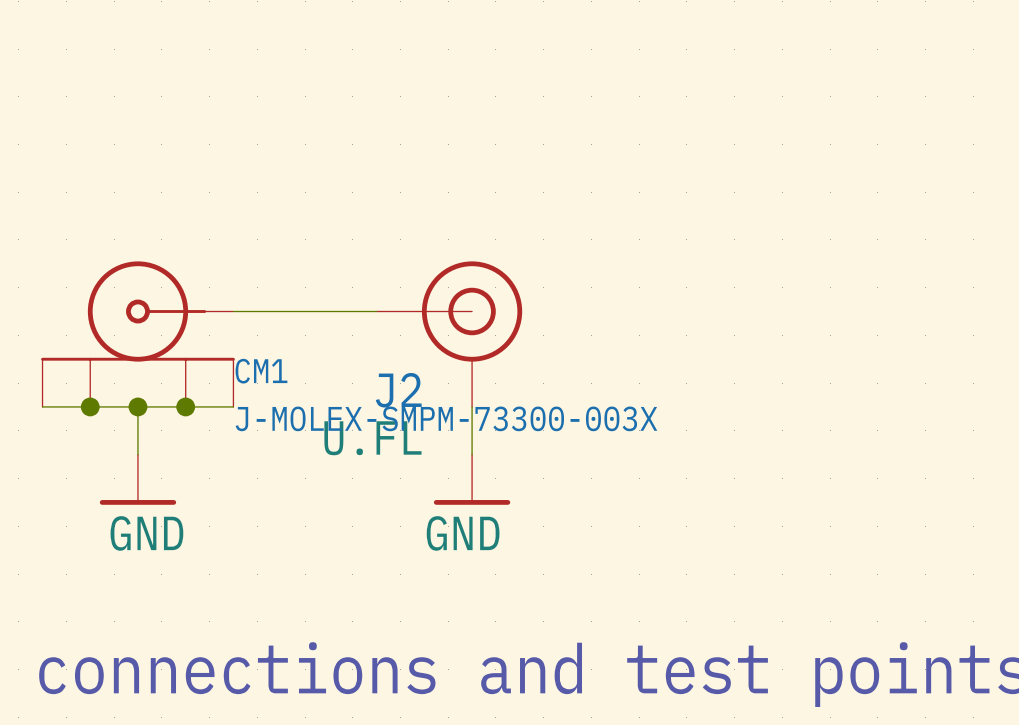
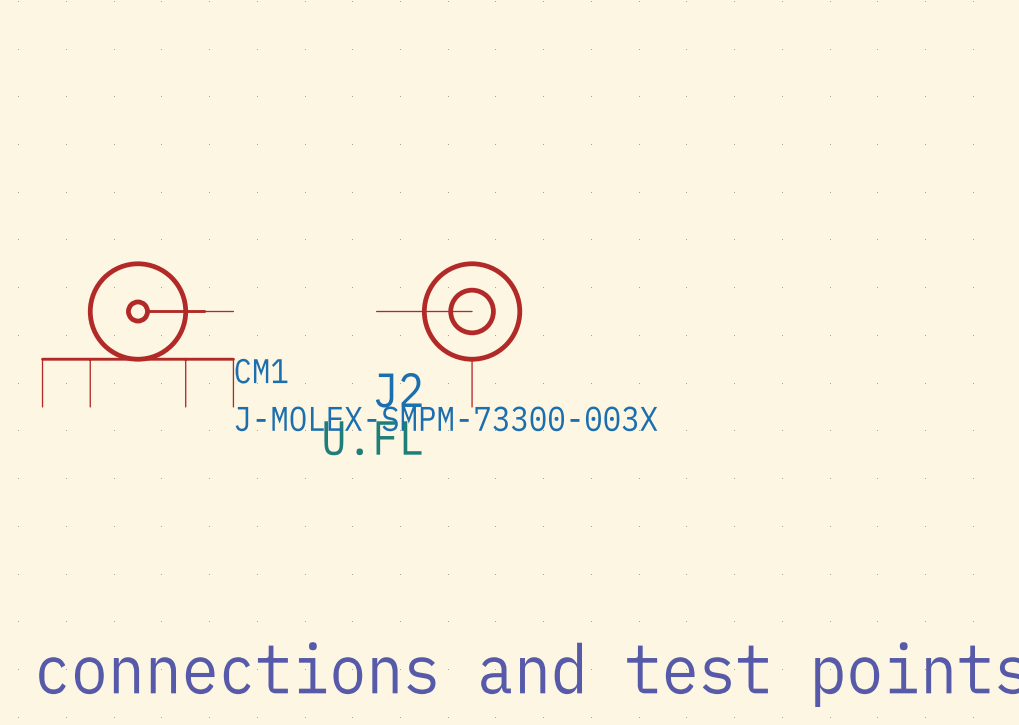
wire: (233, 311) (376, 311) -> none
wire: (42, 406) (233, 406) -> none
junction: (90, 406) -> none
wire: (137, 406) (137, 454) -> none
junction: (137, 406) -> none
junction: (185, 406) -> none
wire: (472, 406) (472, 454) -> none
power symbol: GND (137, 479) -> none
power symbol: GND (472, 479) -> none

